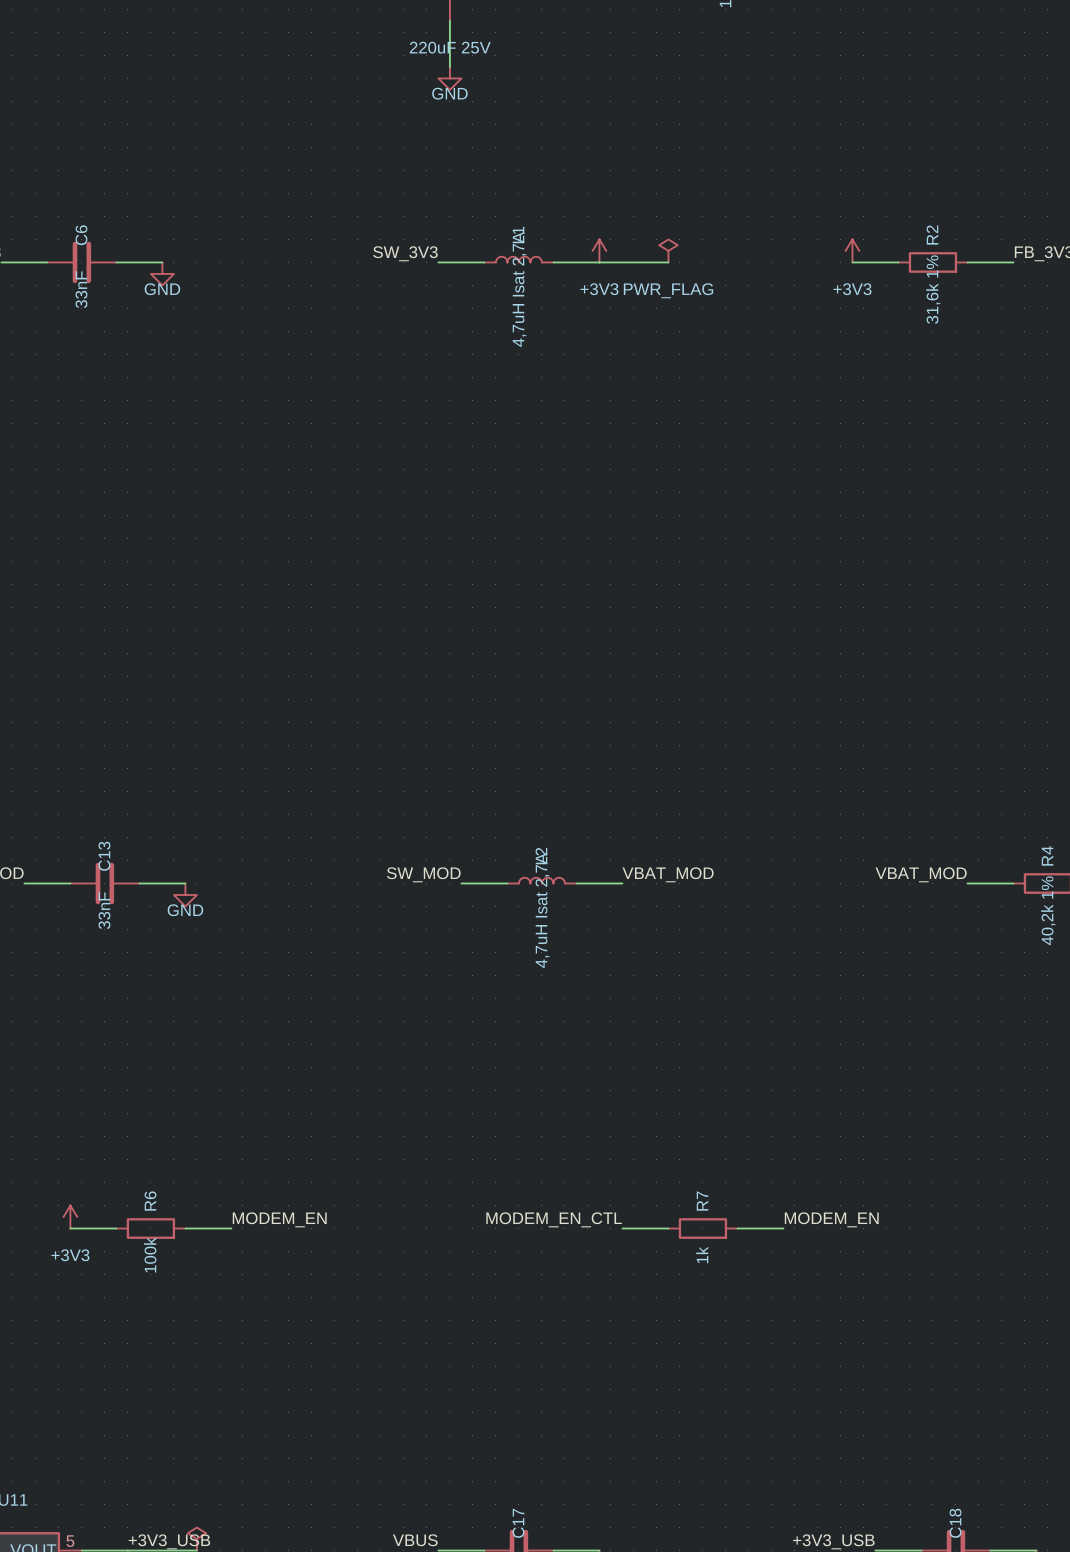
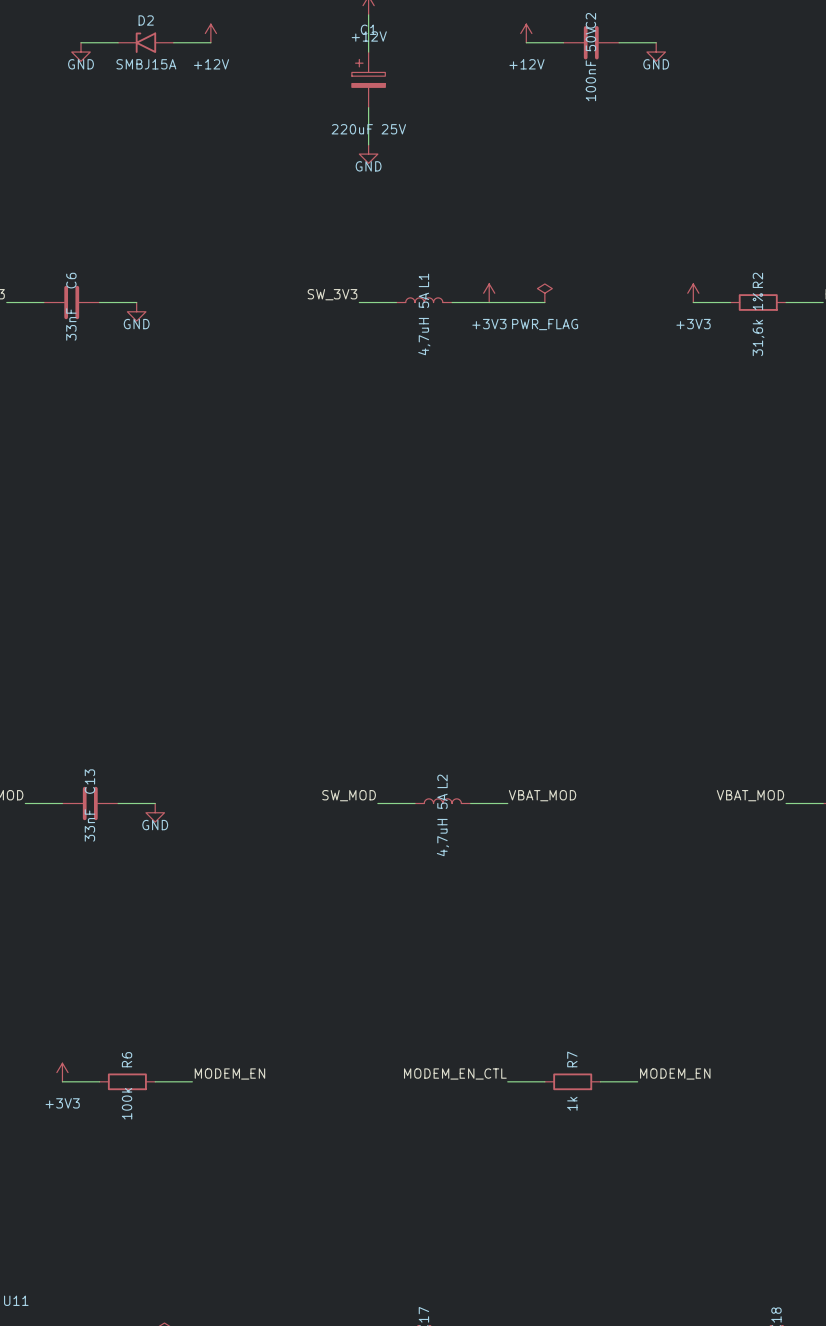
L1 value: 4,7uH Isat 2,7A (519, 289) -> 4,7uH 5A (424, 323)
L2 value: 4,7uH Isat 2,7A (542, 910) -> 4,7uH 5A (442, 824)

